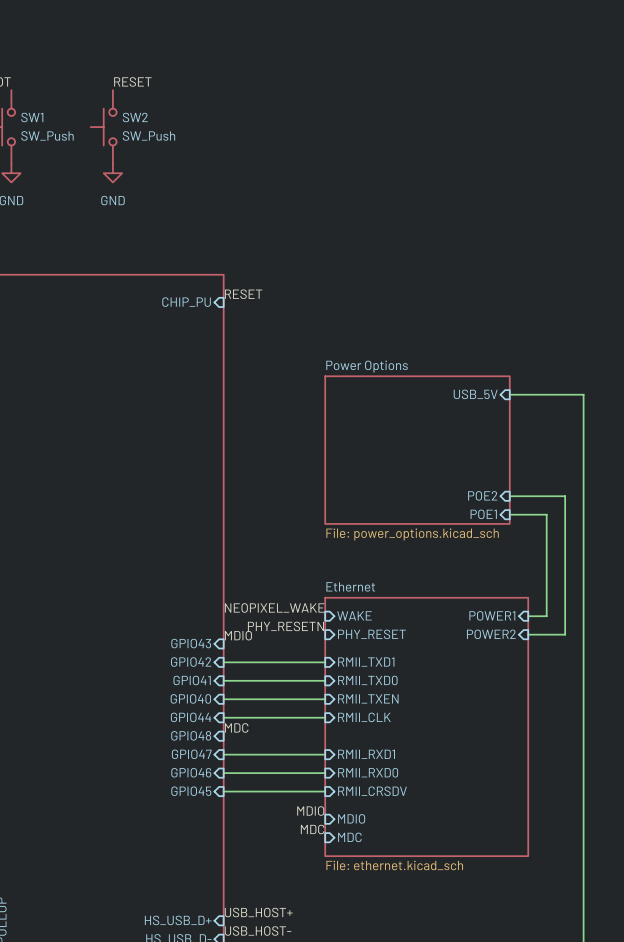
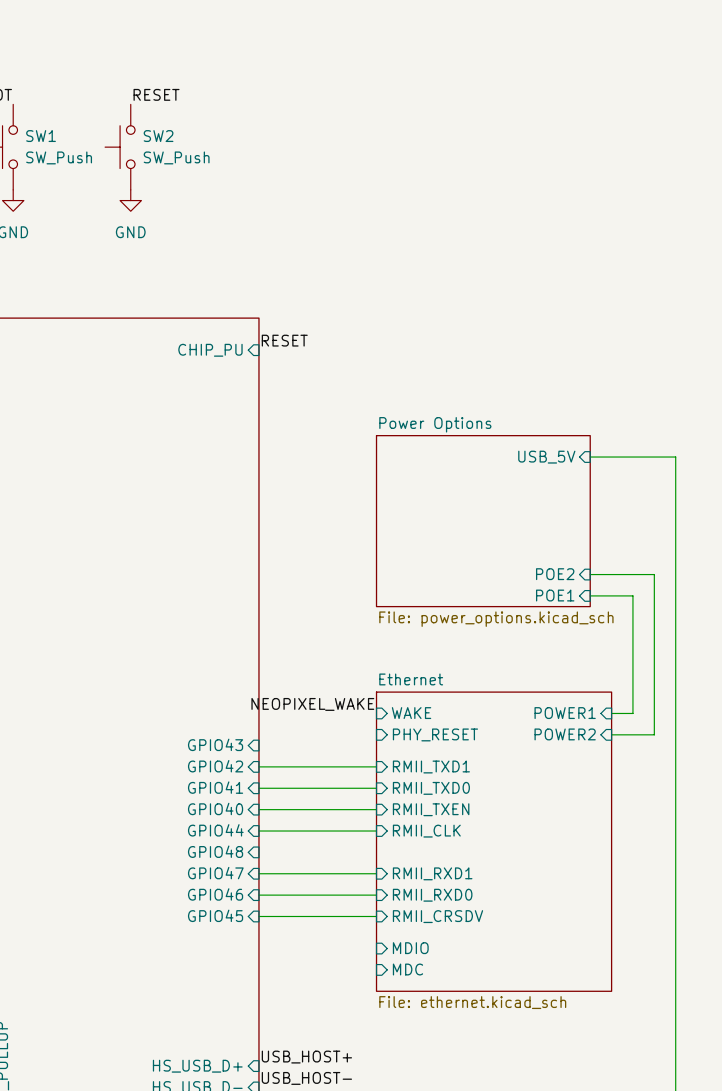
label: PHY_RESETN (285, 626) -> none
label: MDIO (238, 635) -> none
label: MDC (236, 727) -> none
label: MDIO (310, 811) -> none
label: MDC (312, 829) -> none

